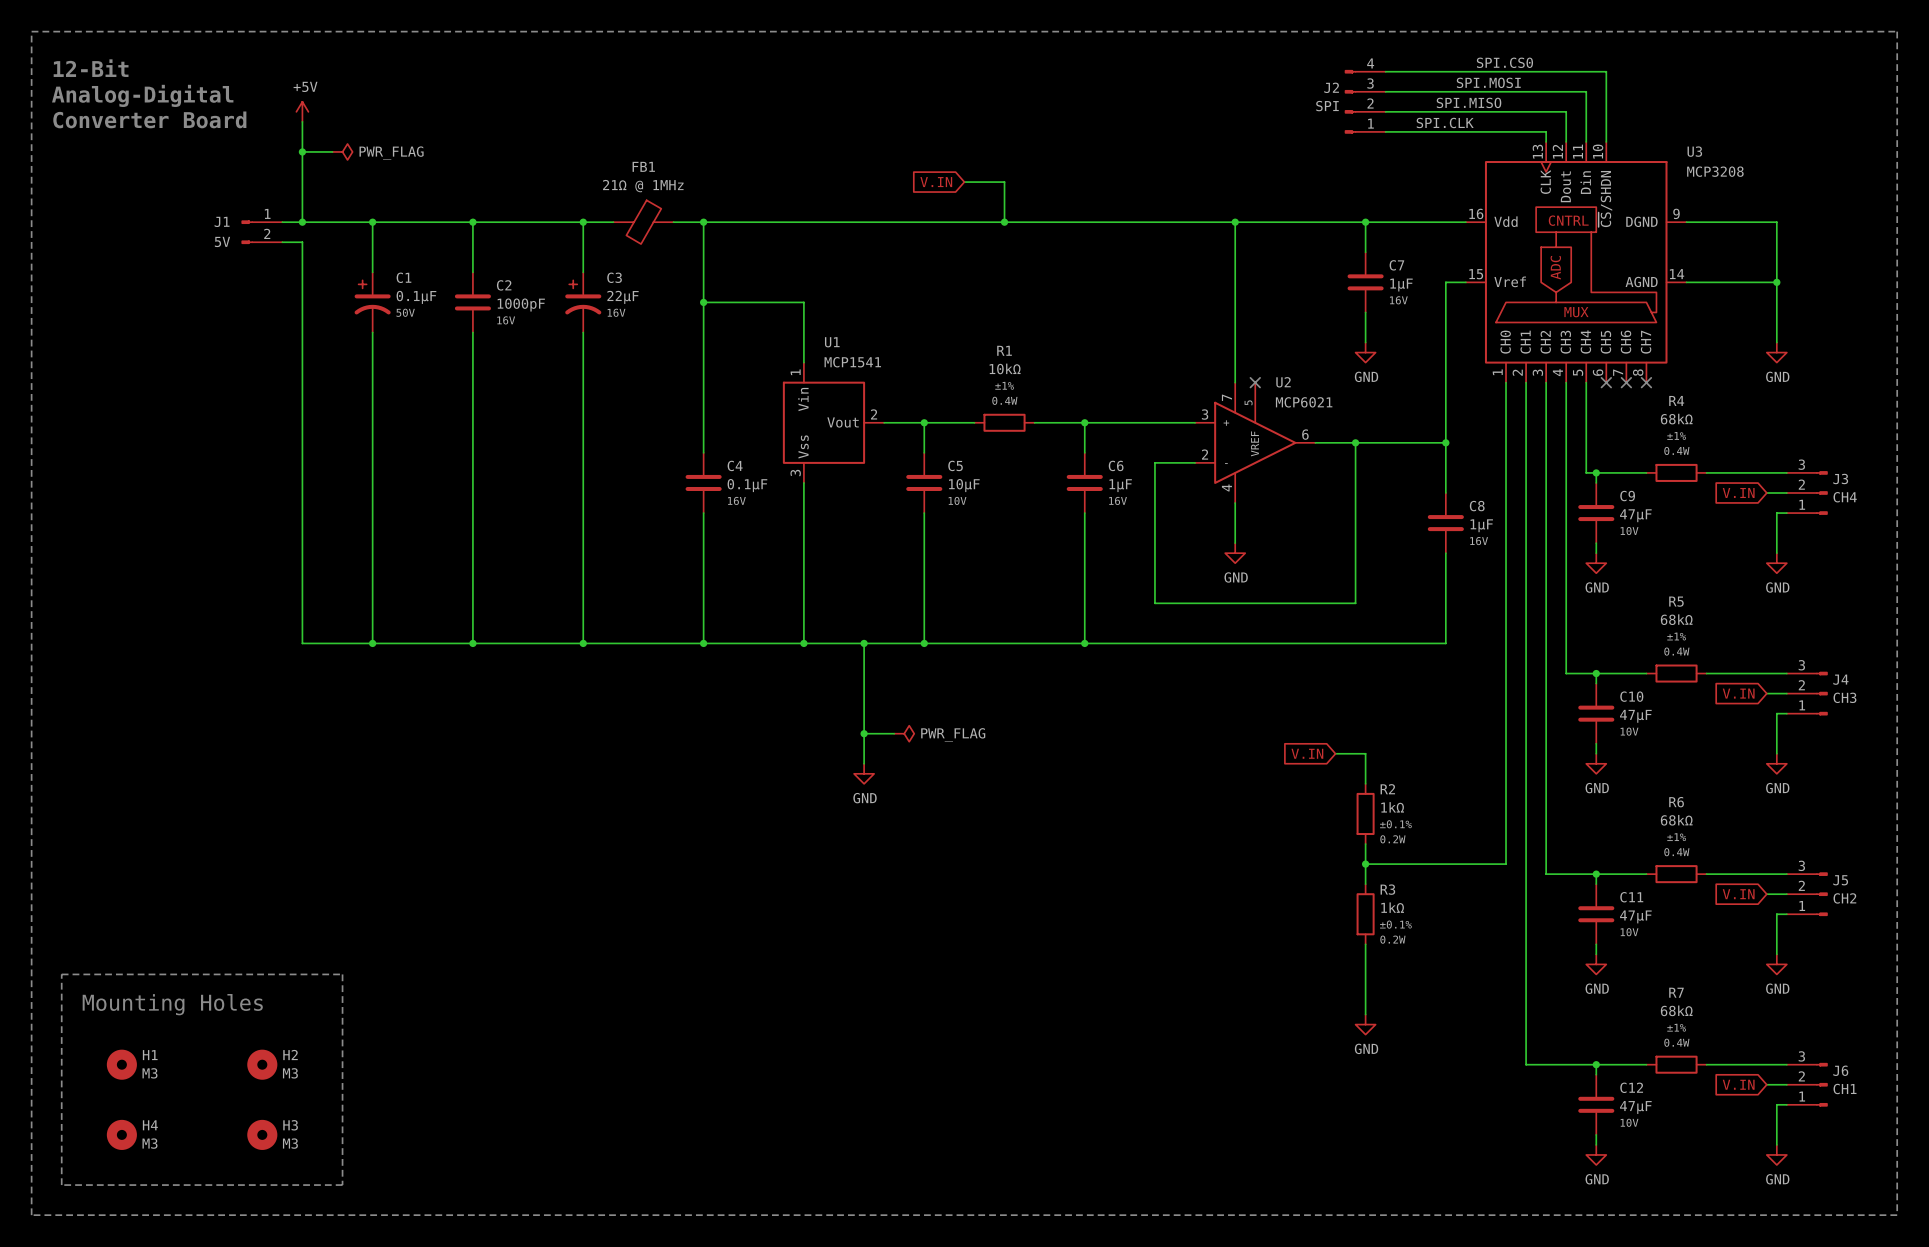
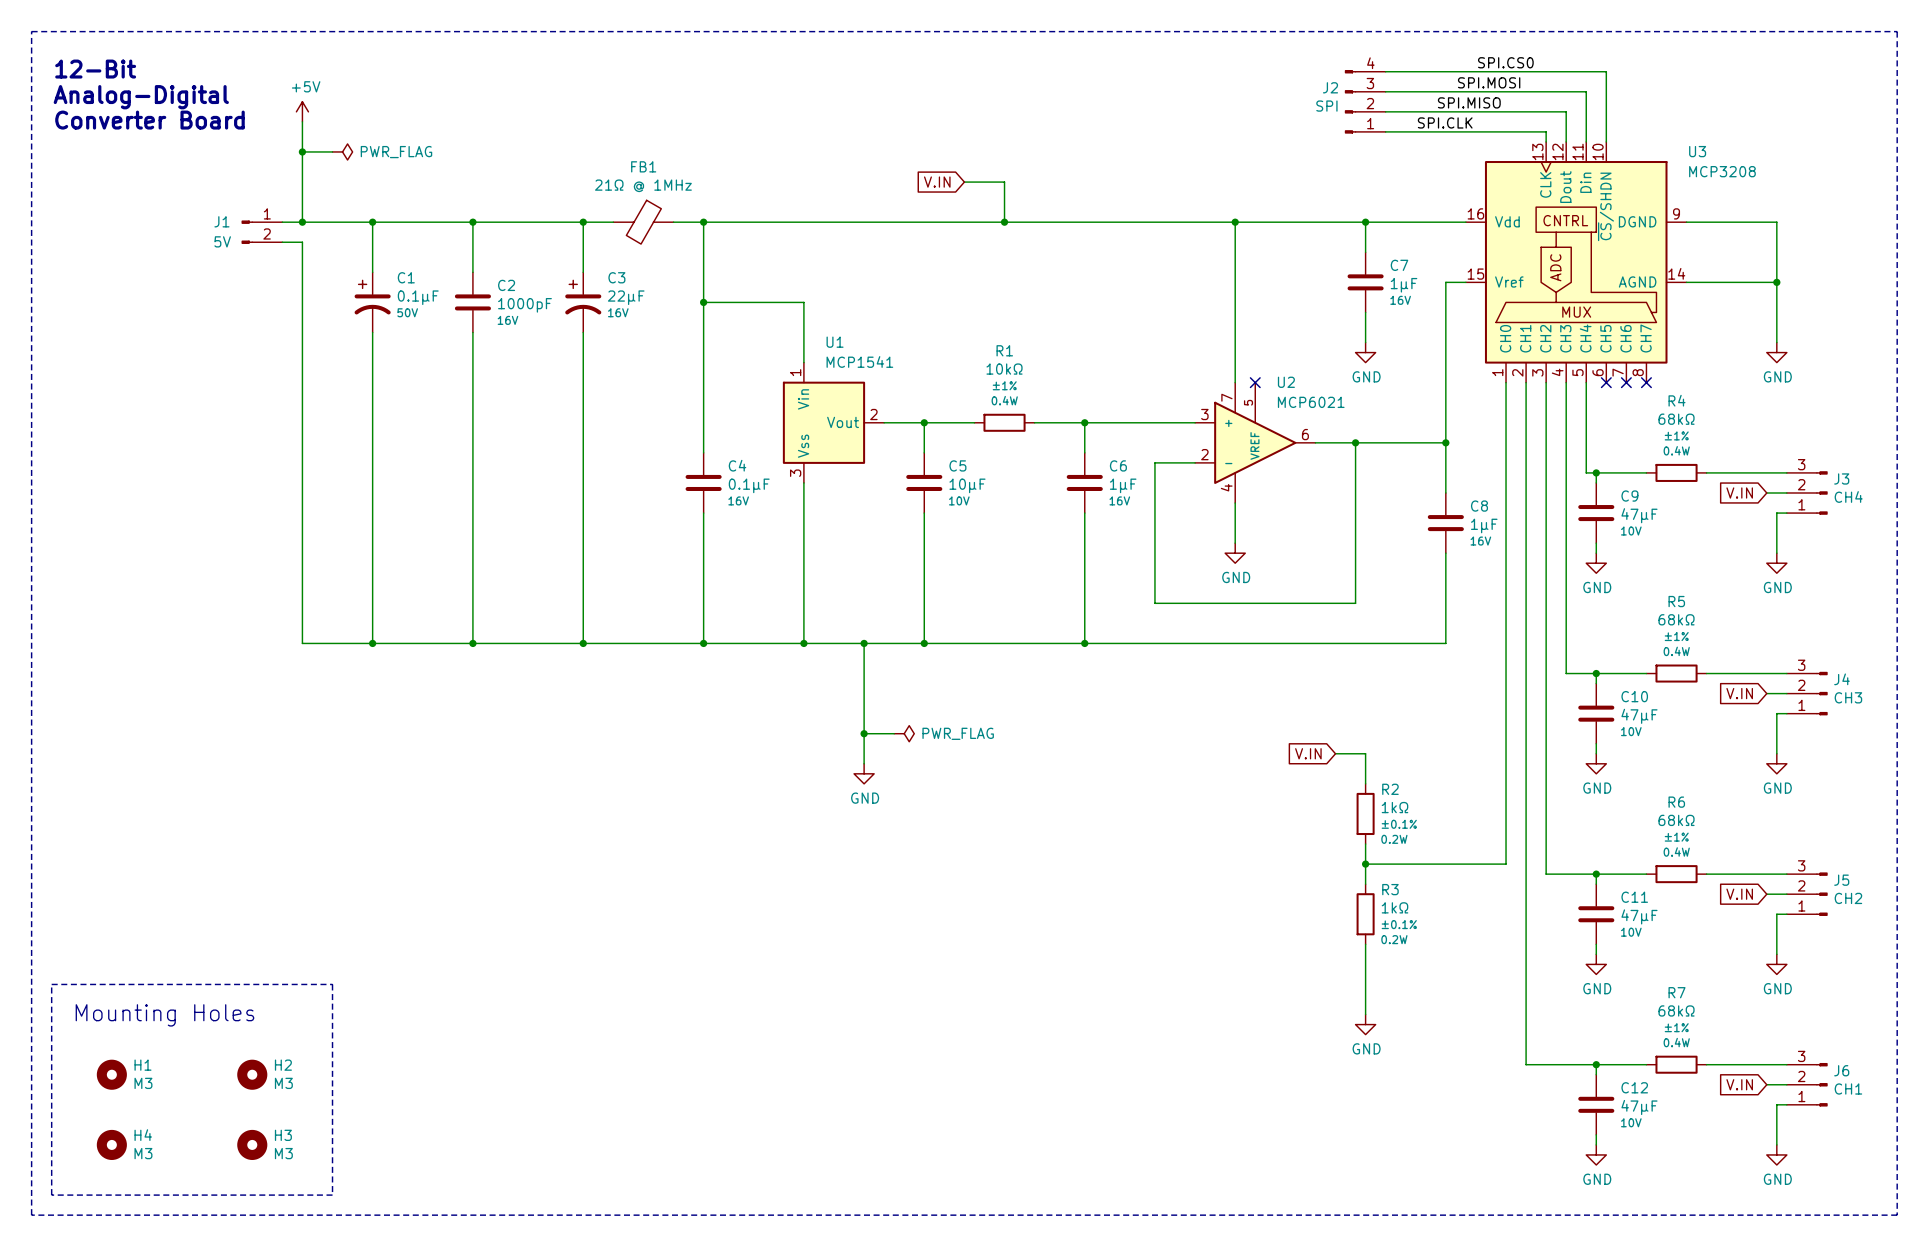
line: (61, 974) (342, 974) (342, 1185) (61, 1185) (61, 974) -> (51, 984) (332, 984) (332, 1195) (51, 1195) (51, 984)
text position: Mounting Holes (172, 1004) -> Mounting Holes (164, 1015)
H1 position: (121, 1064) -> (111, 1074)
H2 position: (262, 1064) -> (252, 1074)
H4 position: (121, 1134) -> (111, 1144)
H3 position: (262, 1134) -> (252, 1144)

